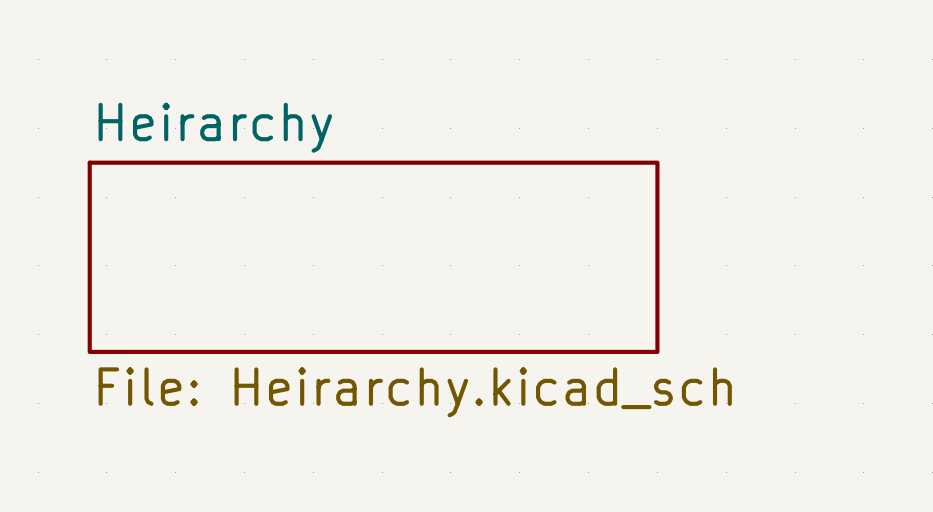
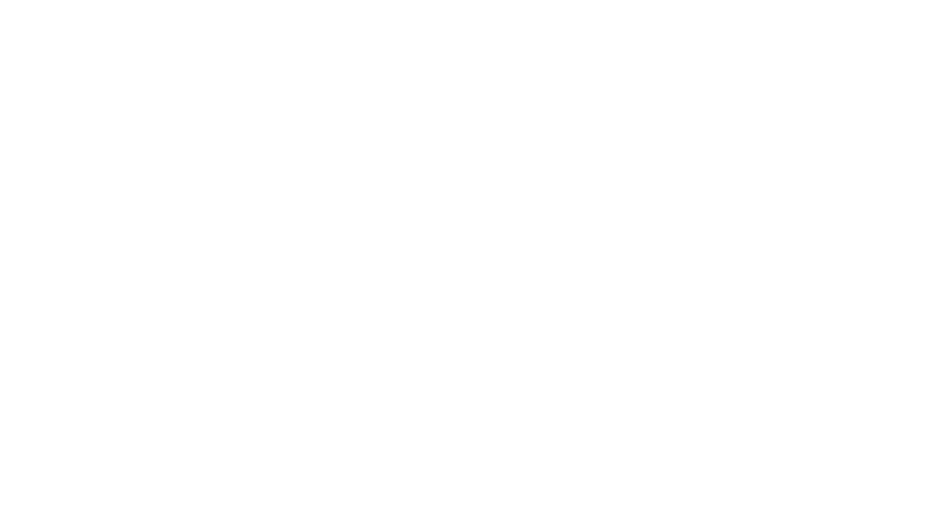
sheet Heirarchy: File: Heirarchy.kicad_sch (373, 257) -> none

